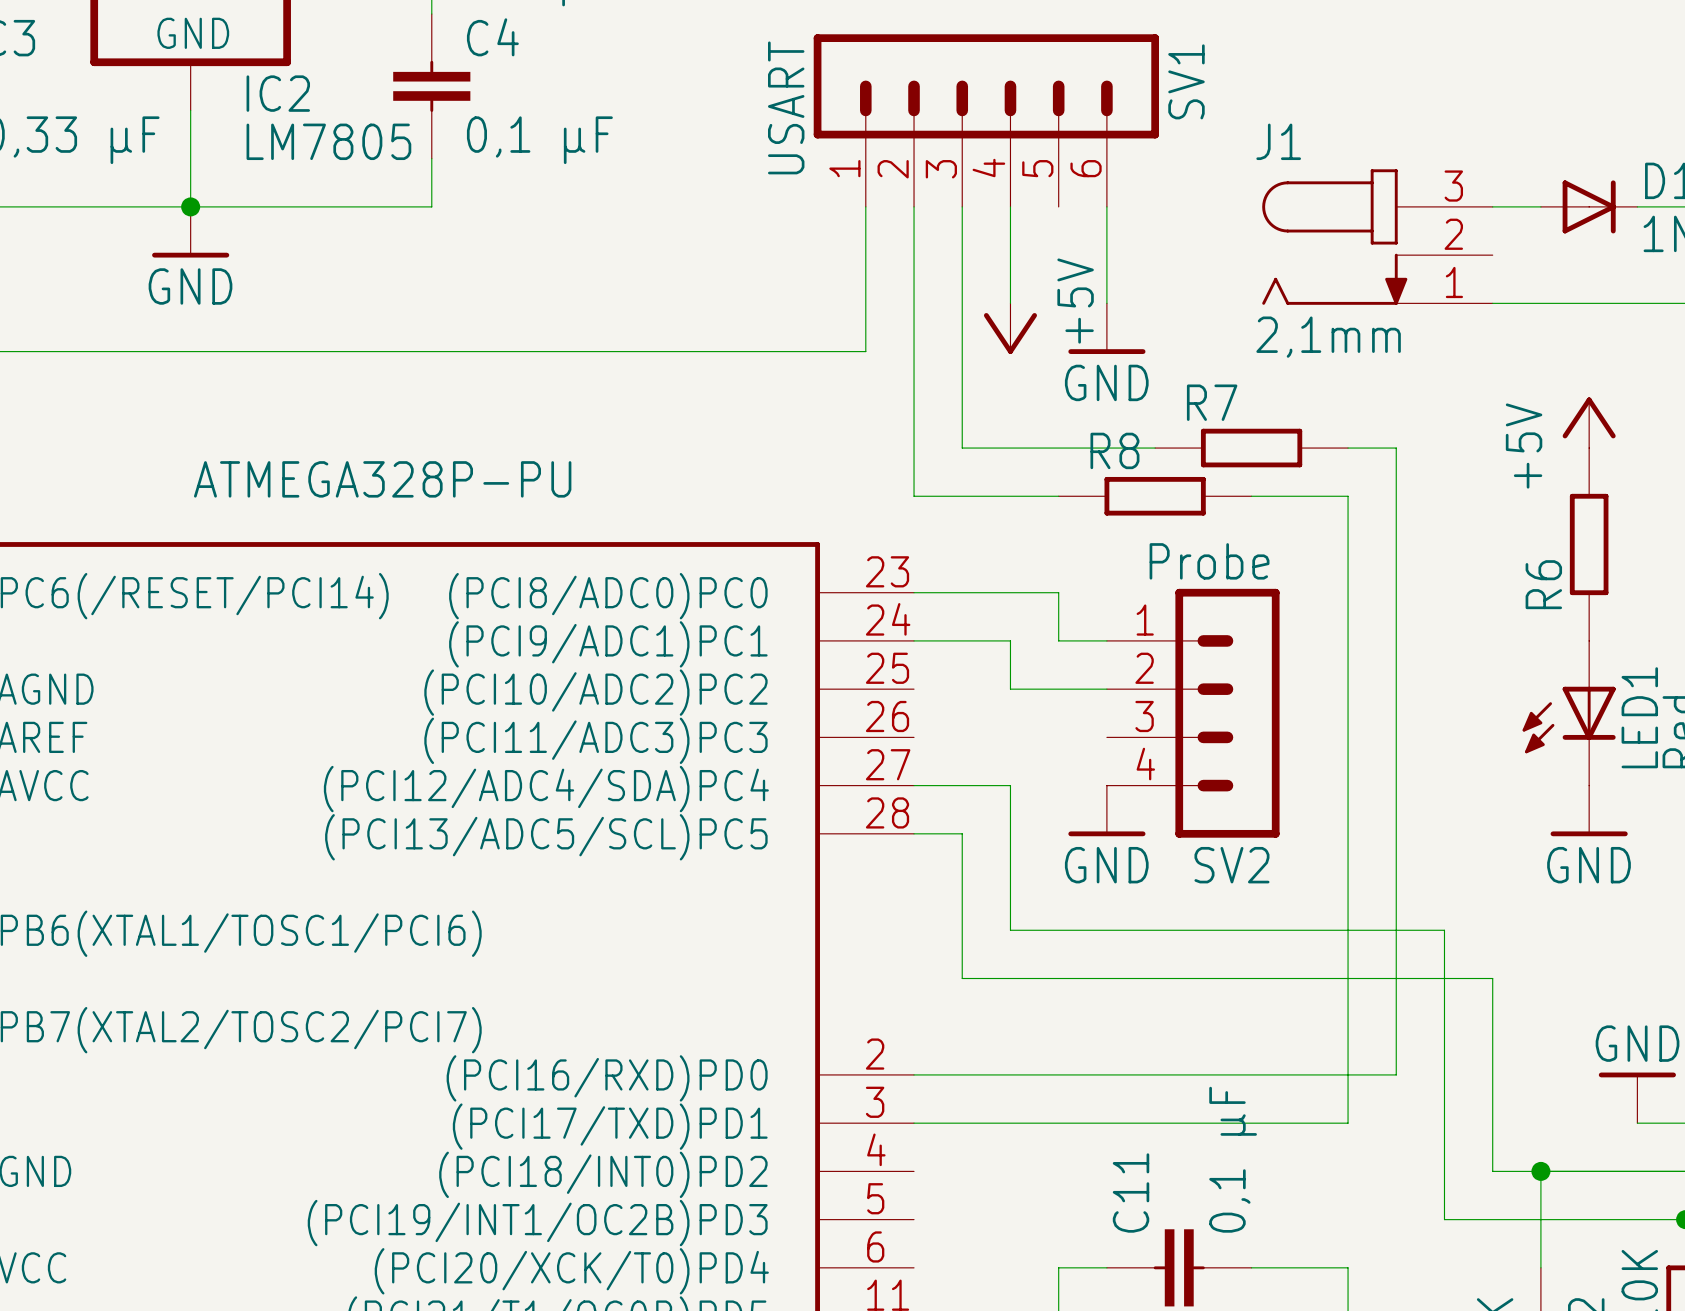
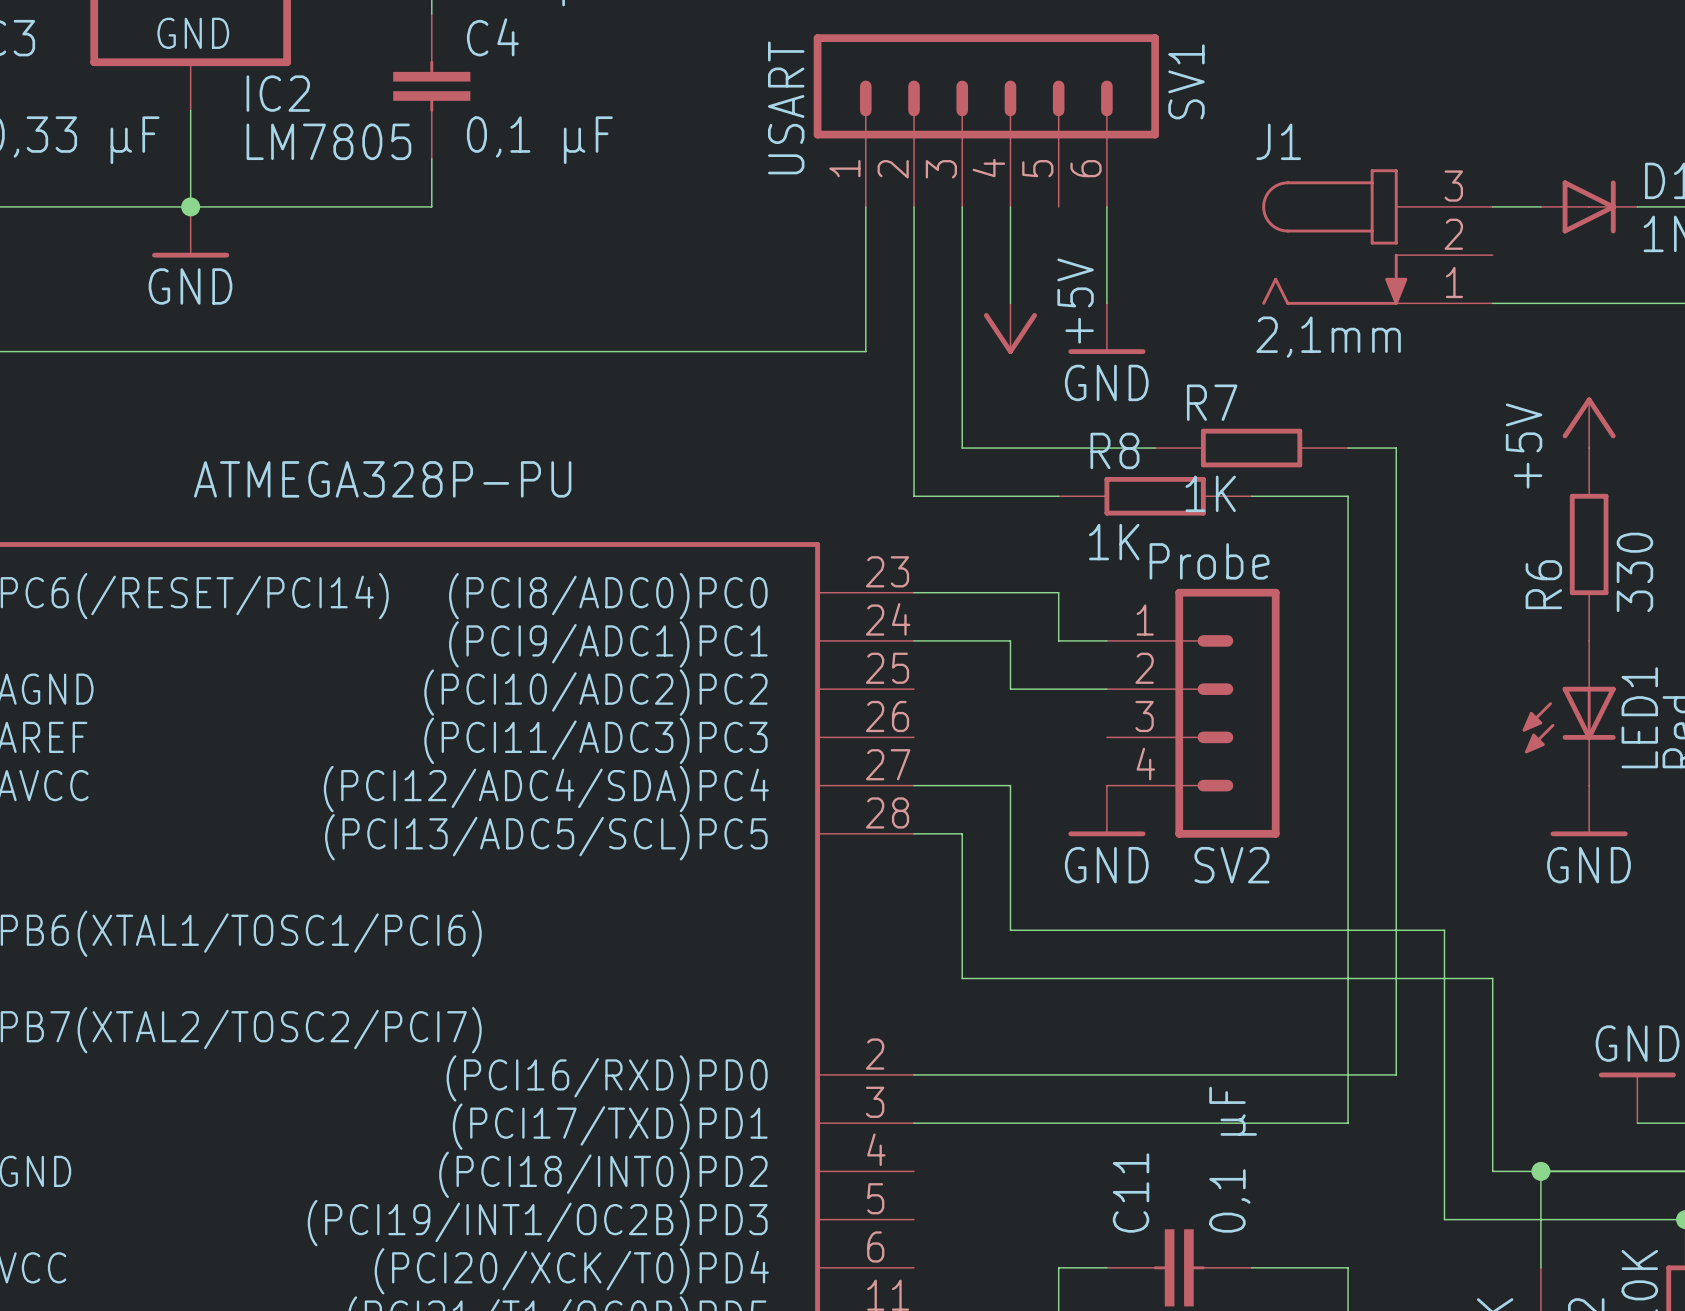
R7 value: none -> 1K (1210, 493)
R8 value: none -> 1K (1114, 542)
R6 value: none -> 330 (1634, 572)

